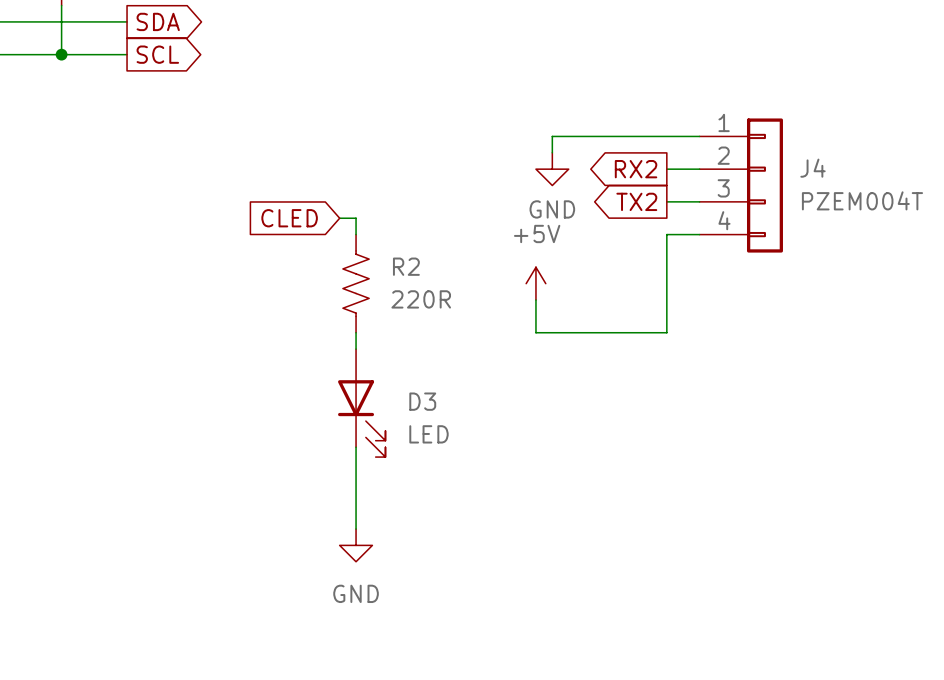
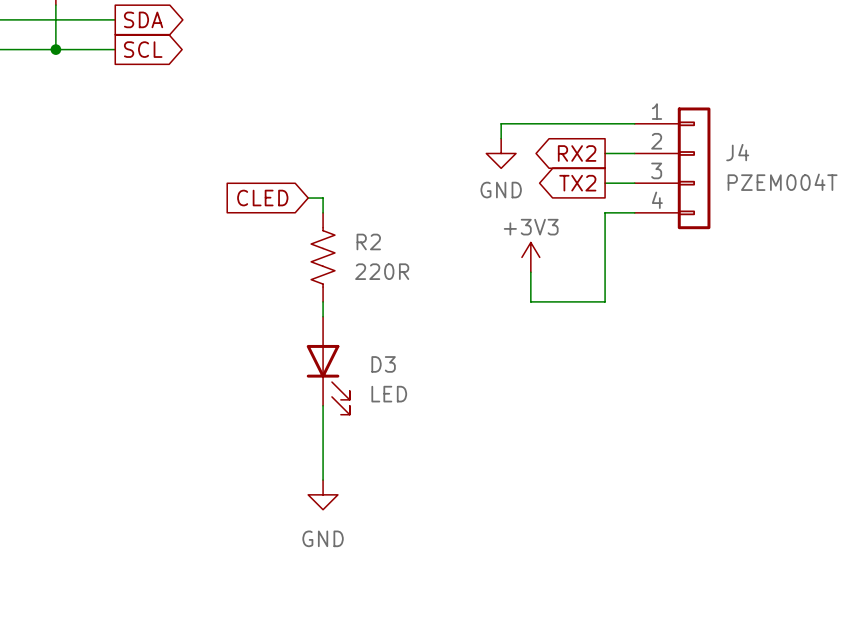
power symbol: +5V (535, 283) -> none
power symbol: none -> +3V3 (530, 257)
wire: (535, 300) (535, 332) (585, 332) -> (530, 272) (530, 301)

